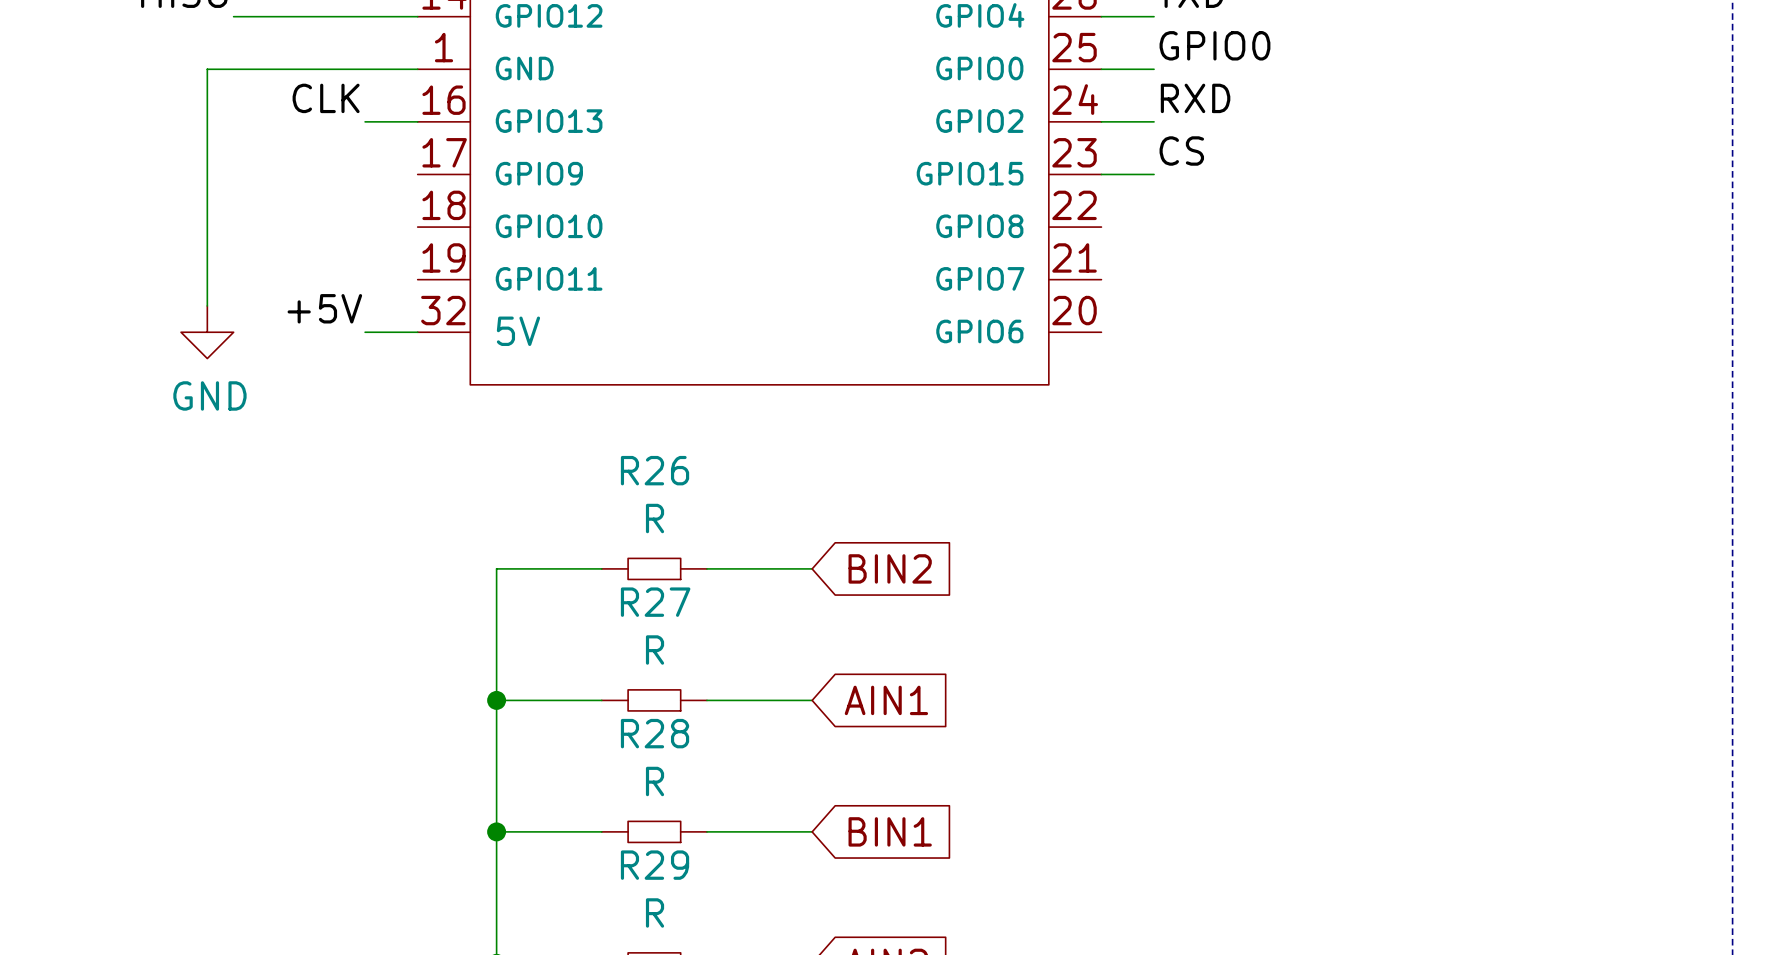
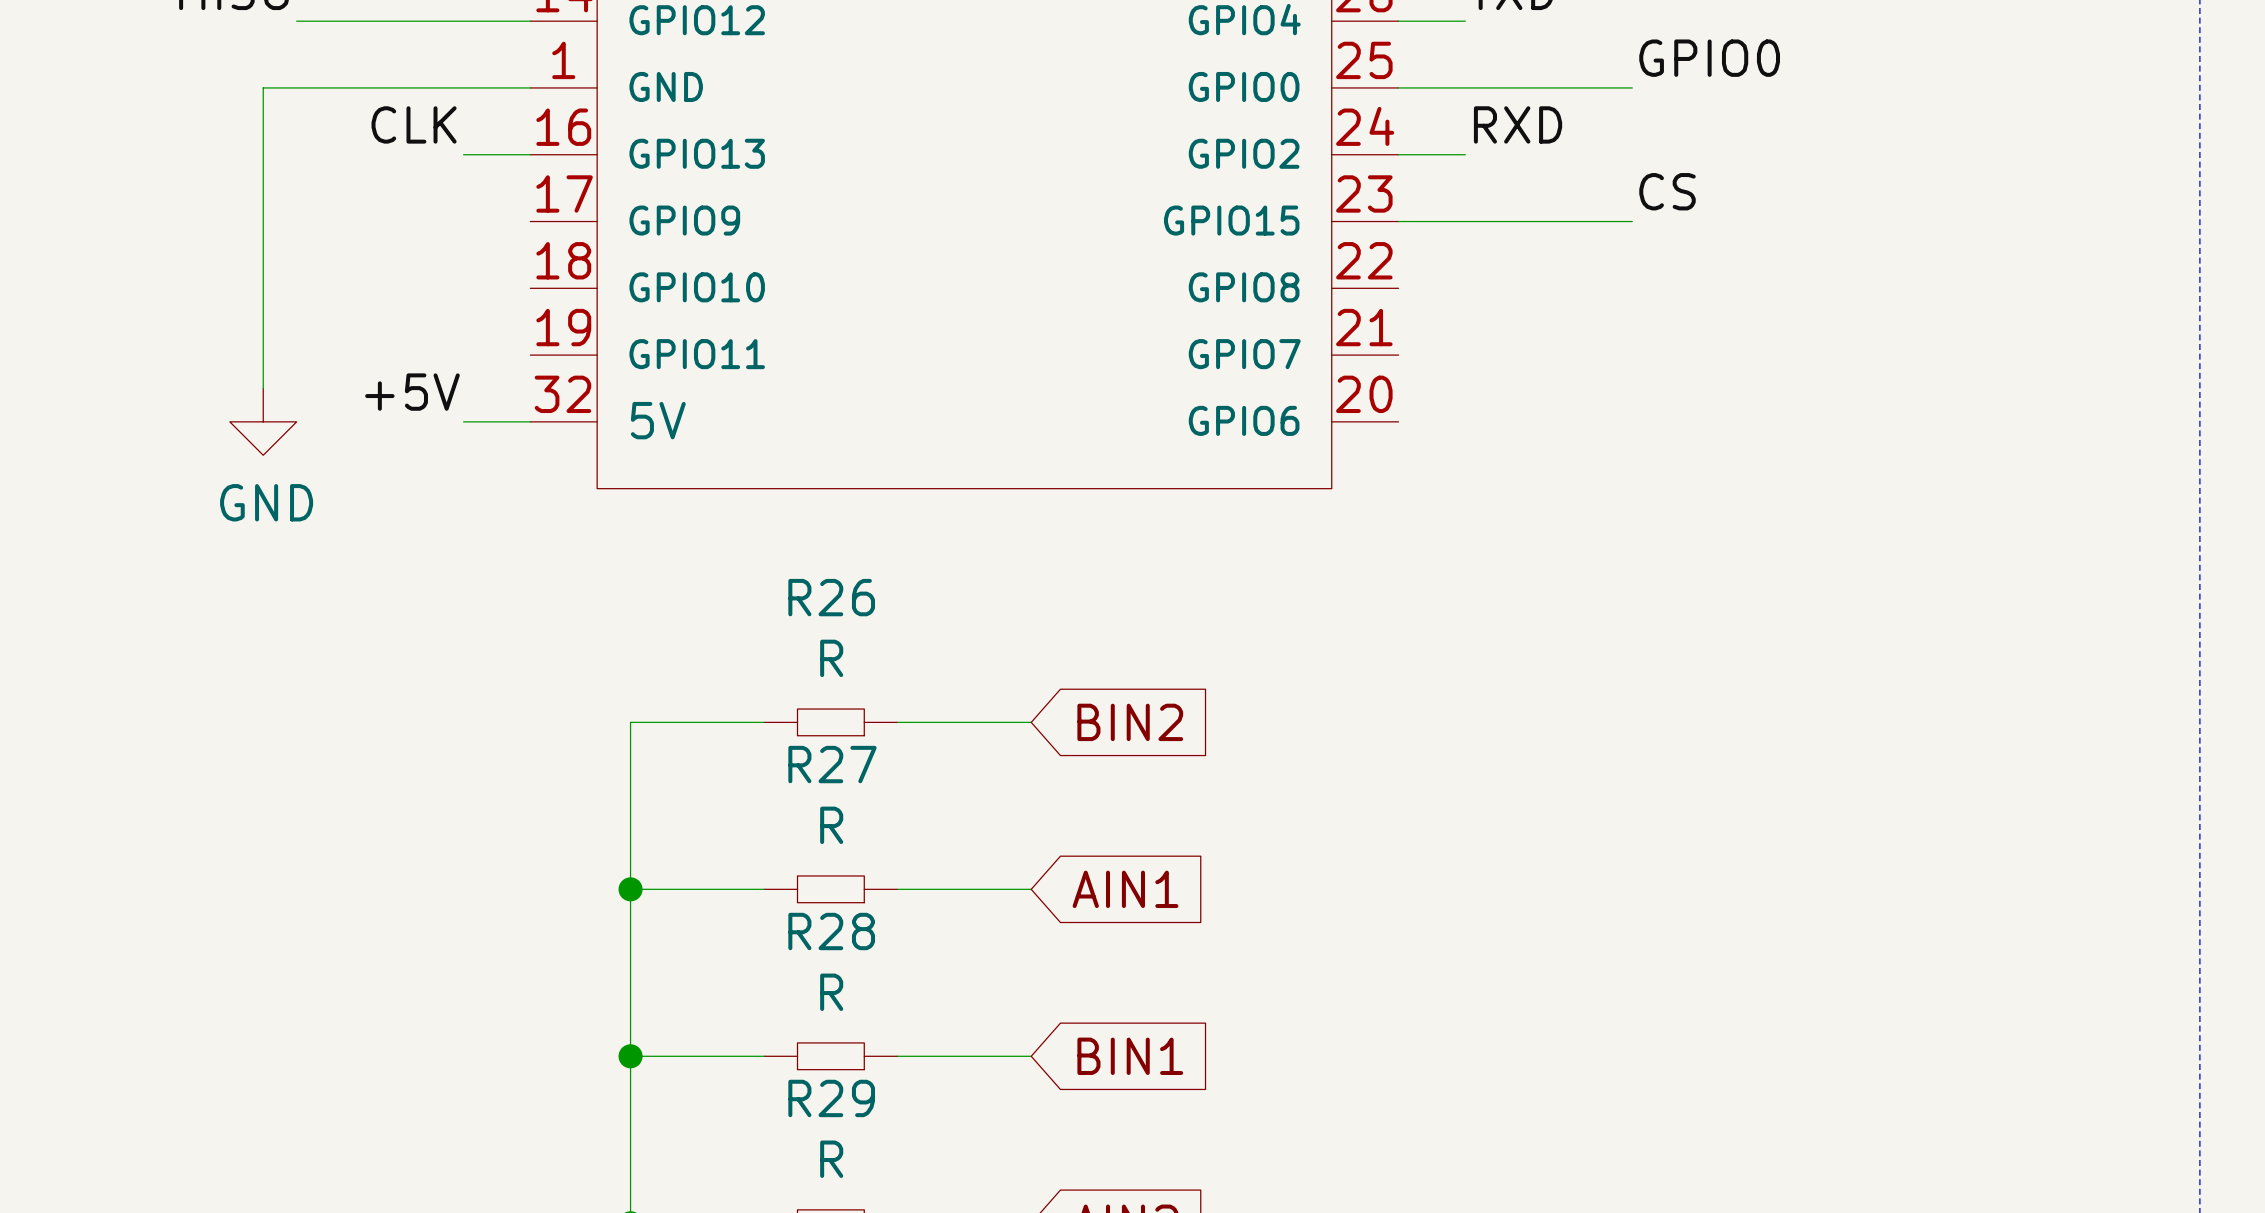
label position: GPIO0 (1214, 45) -> GPIO0 (1709, 58)
wire: none -> (1465, 87) (1632, 87)
label position: CS (1181, 151) -> CS (1667, 191)
wire: none -> (1465, 221) (1632, 221)

